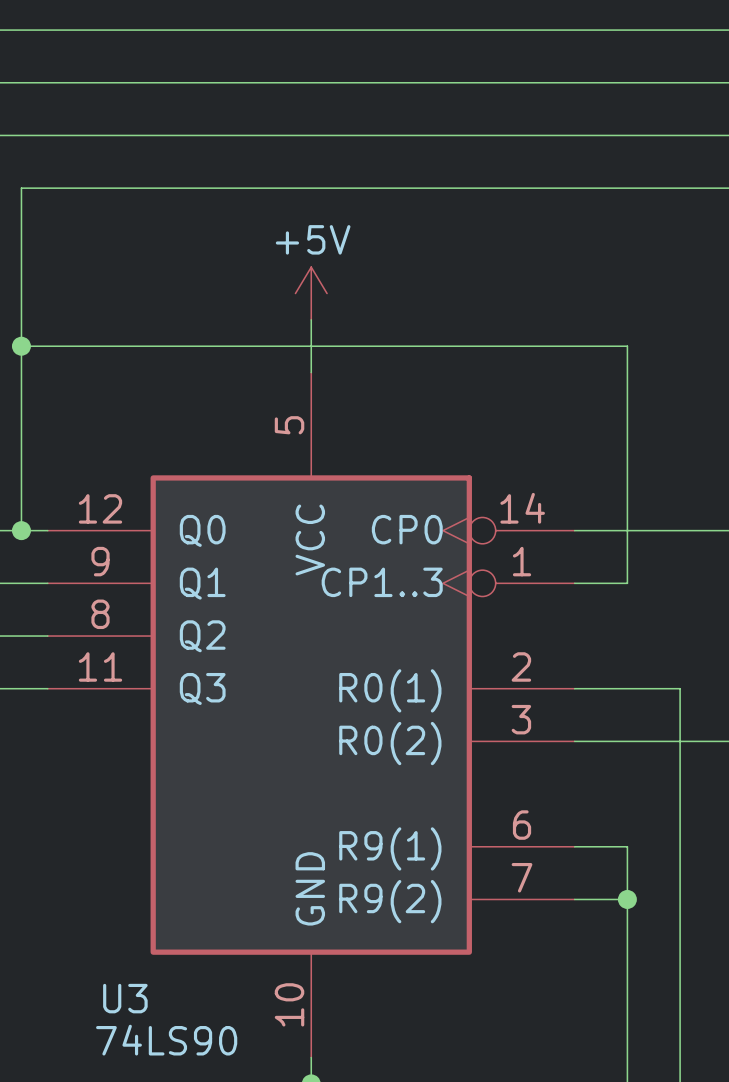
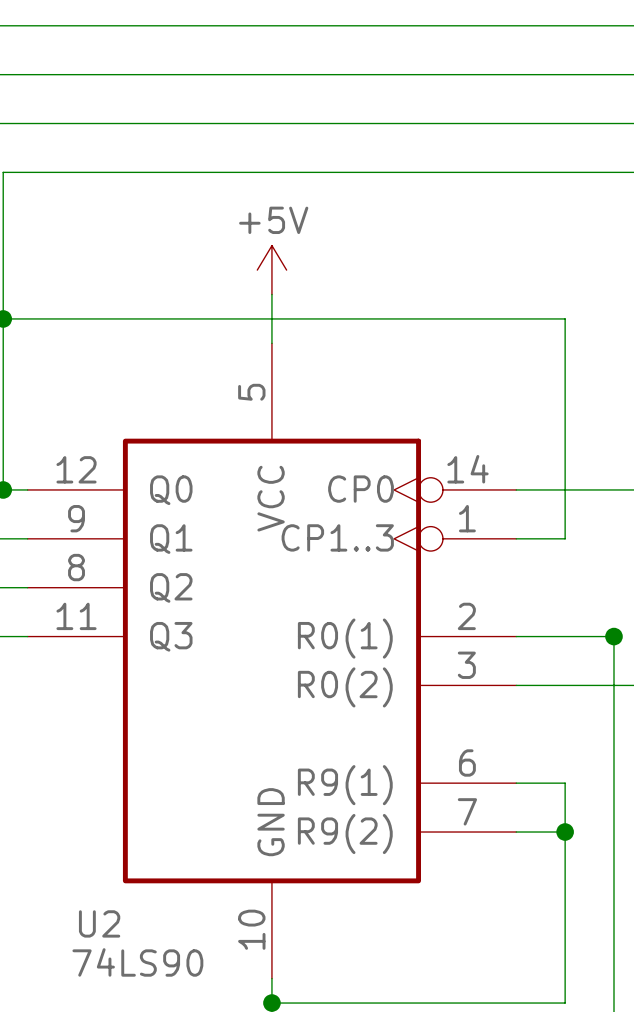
junction: none -> (613, 636)
U3 name: U3 (125, 998) -> U2 (99, 923)

